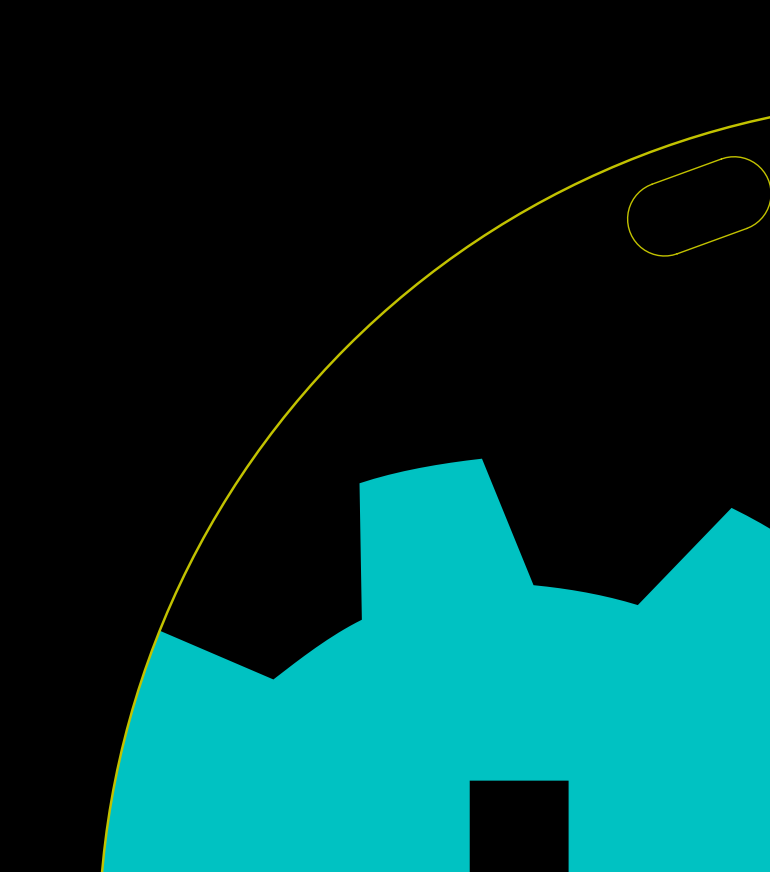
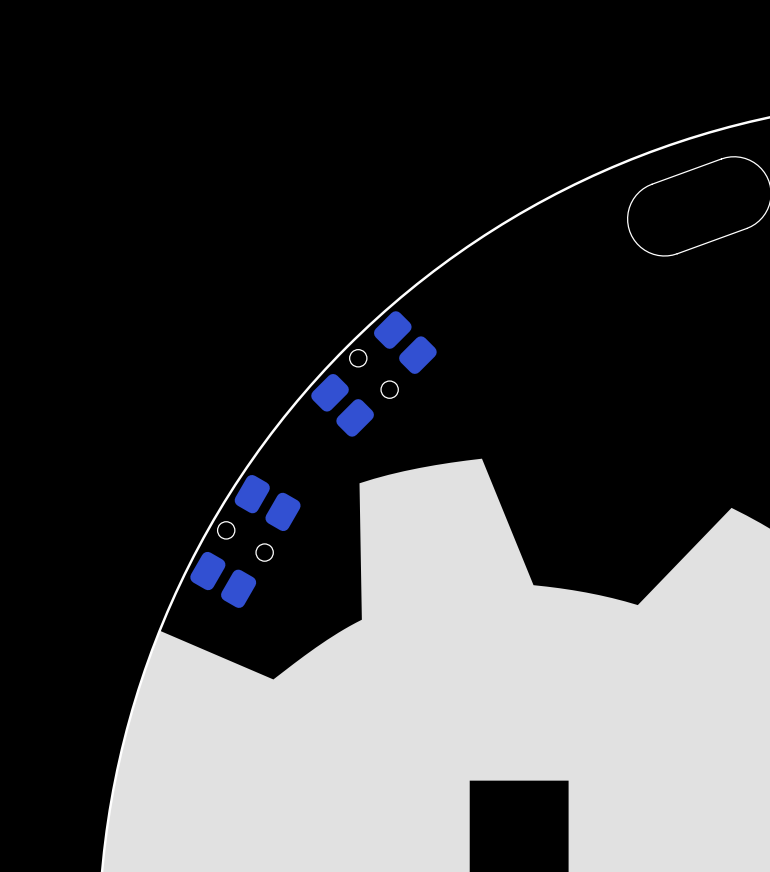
part: none -> (373, 373)
part: none -> (245, 541)

